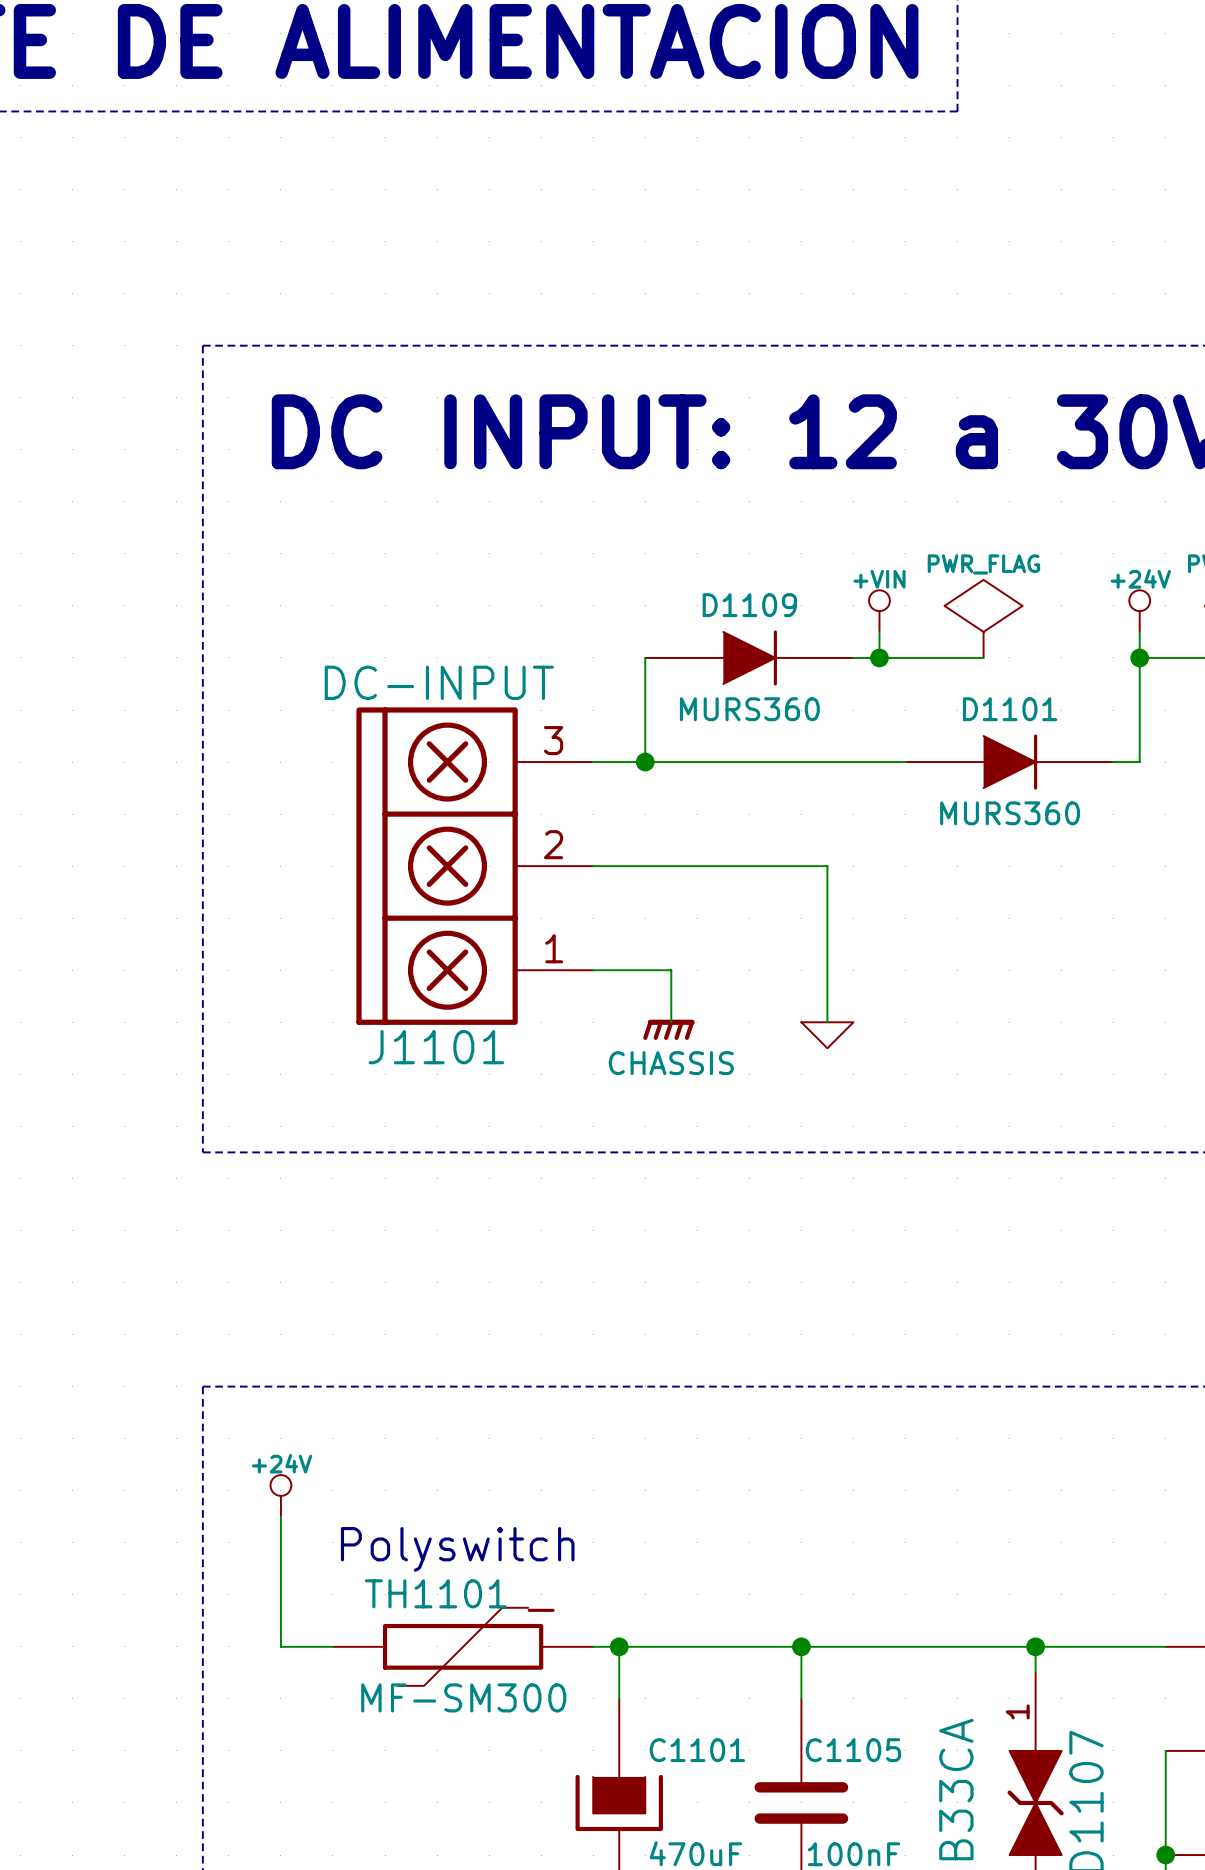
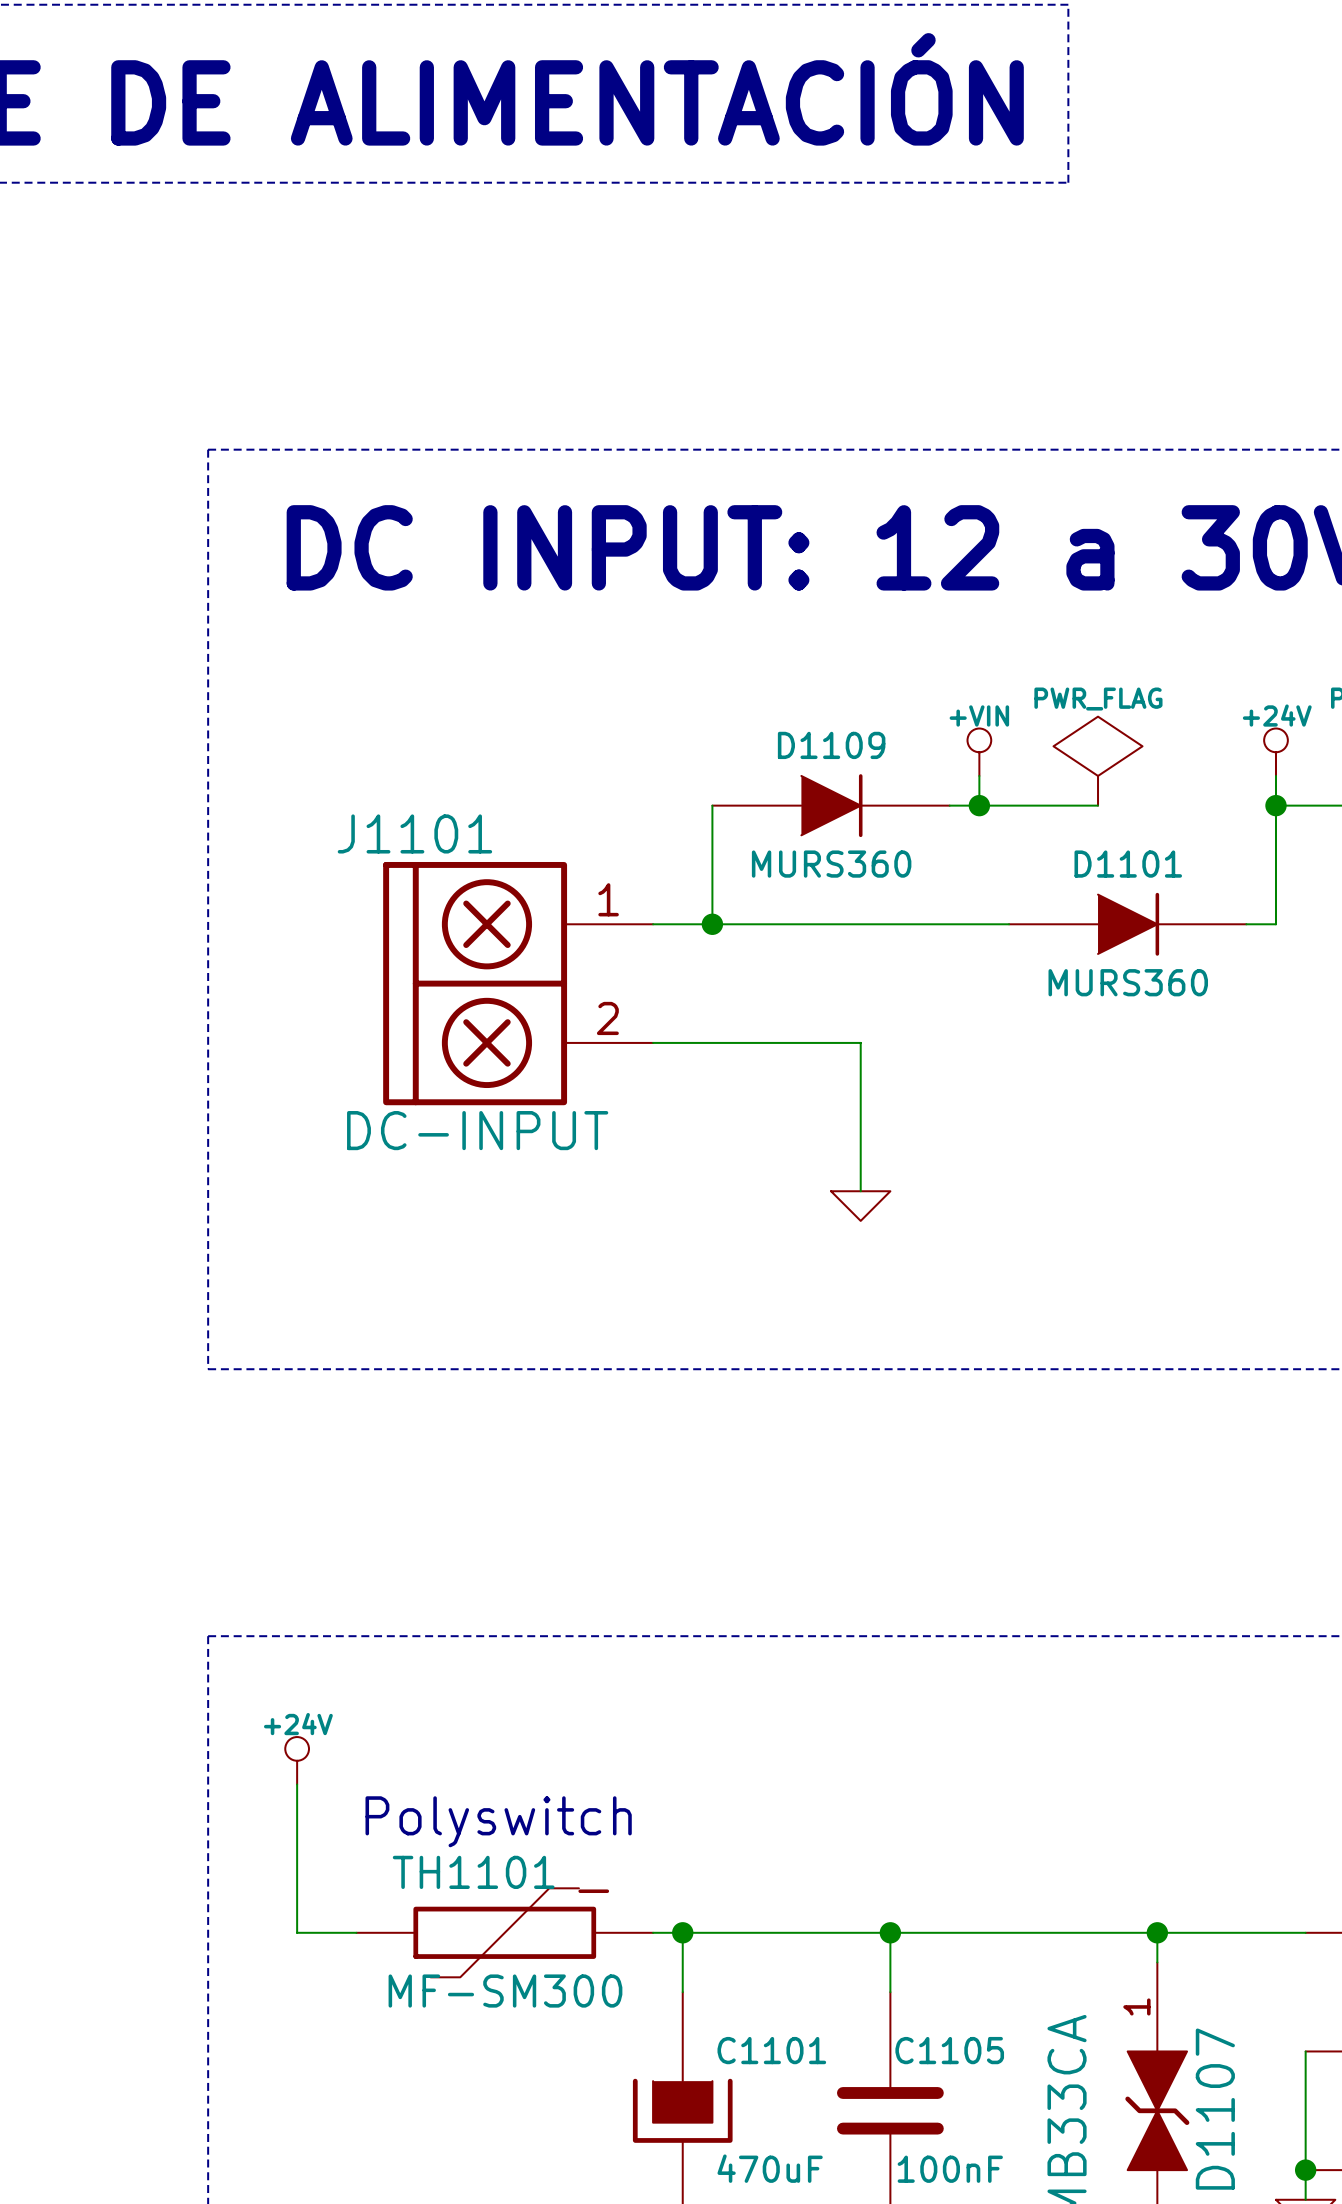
J1101 value position: DC-INPUT (439, 682) -> DC-INPUT (477, 1130)
J1101 symbol: [356, 707, 594, 1025] -> [383, 861, 654, 1106]
wire: (775, 866) (827, 866) (827, 1022) -> (860, 1042) (860, 1191)
wire: (593, 970) (671, 970) (671, 1022) -> none
power symbol: CHASSIS (668, 1029) -> none
power symbol position: (827, 1035) -> (860, 1206)
J1101 name position: J1101 (436, 1047) -> J1101 (414, 833)

